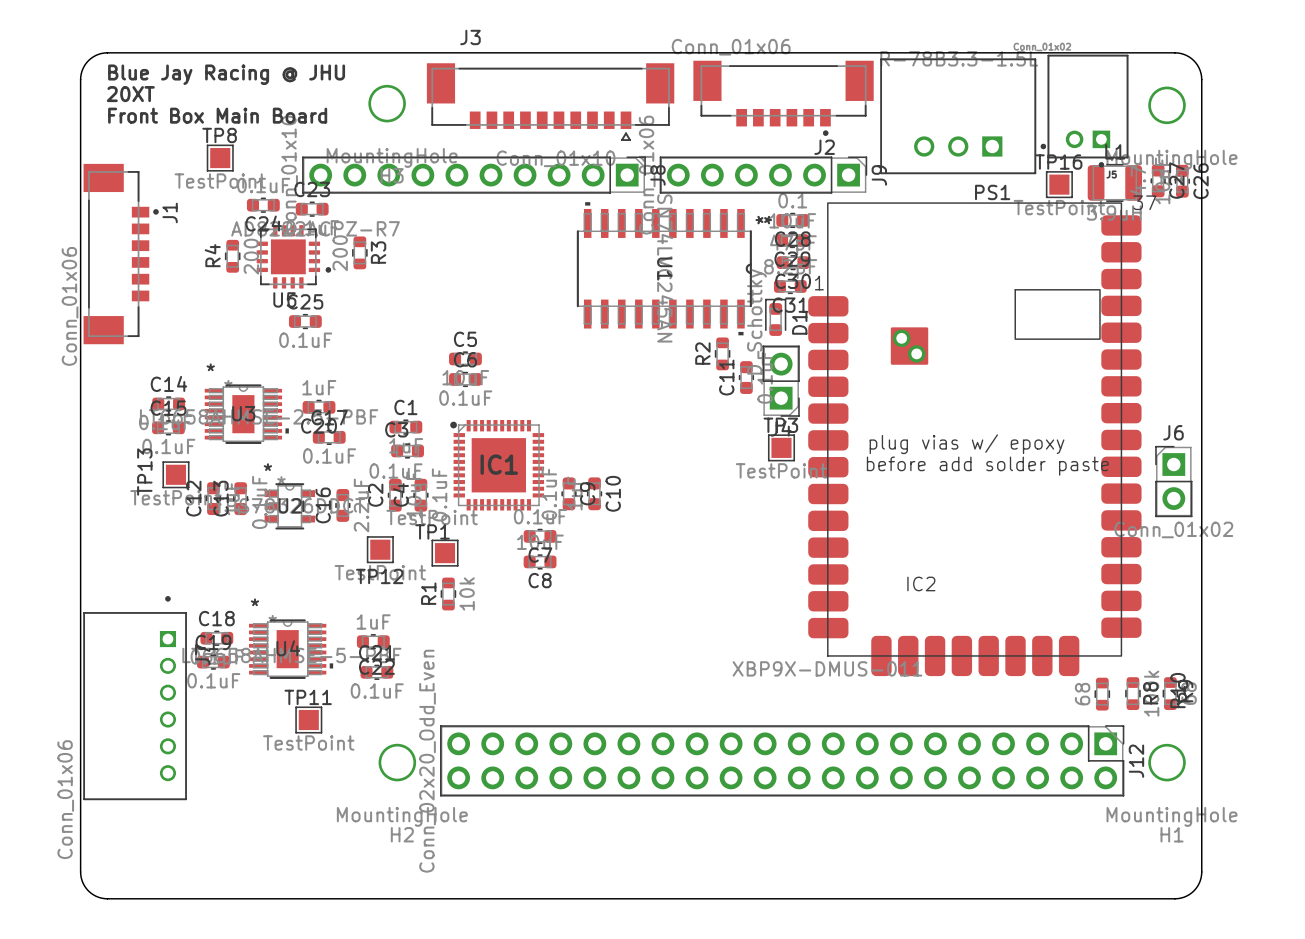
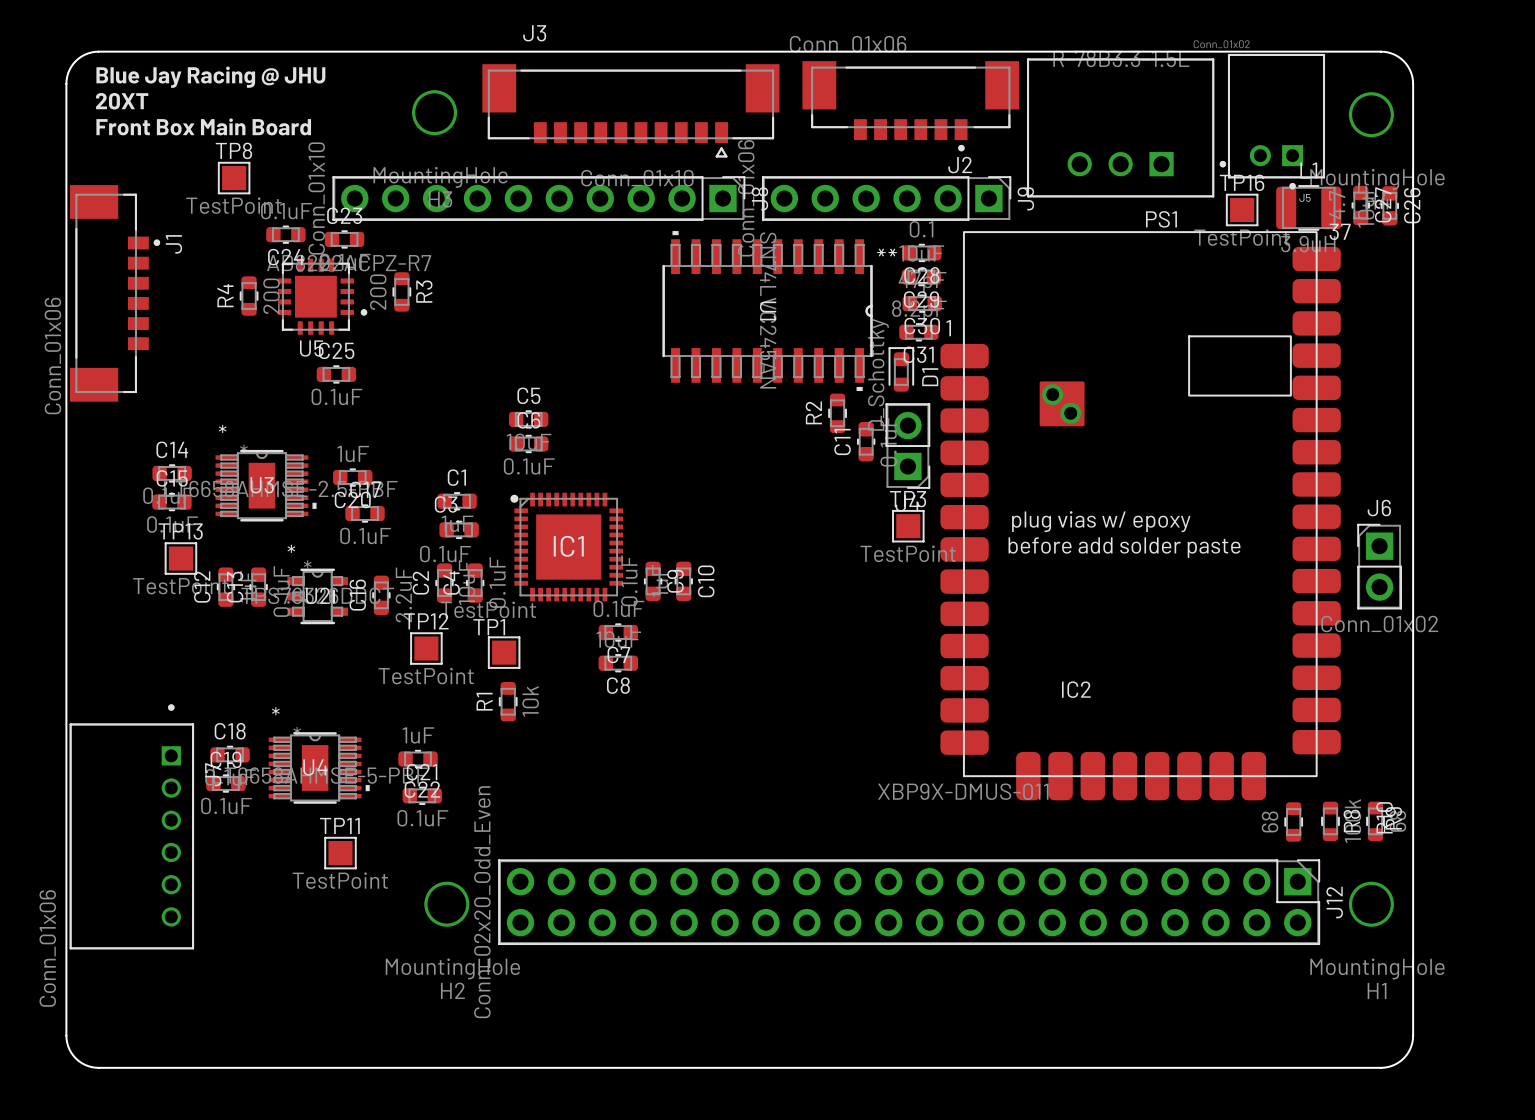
TP13 name rotation: 0° (144, 472) -> 90° clockwise (180, 531)
TP12 name position: TP12 (379, 576) -> TP12 (426, 621)

